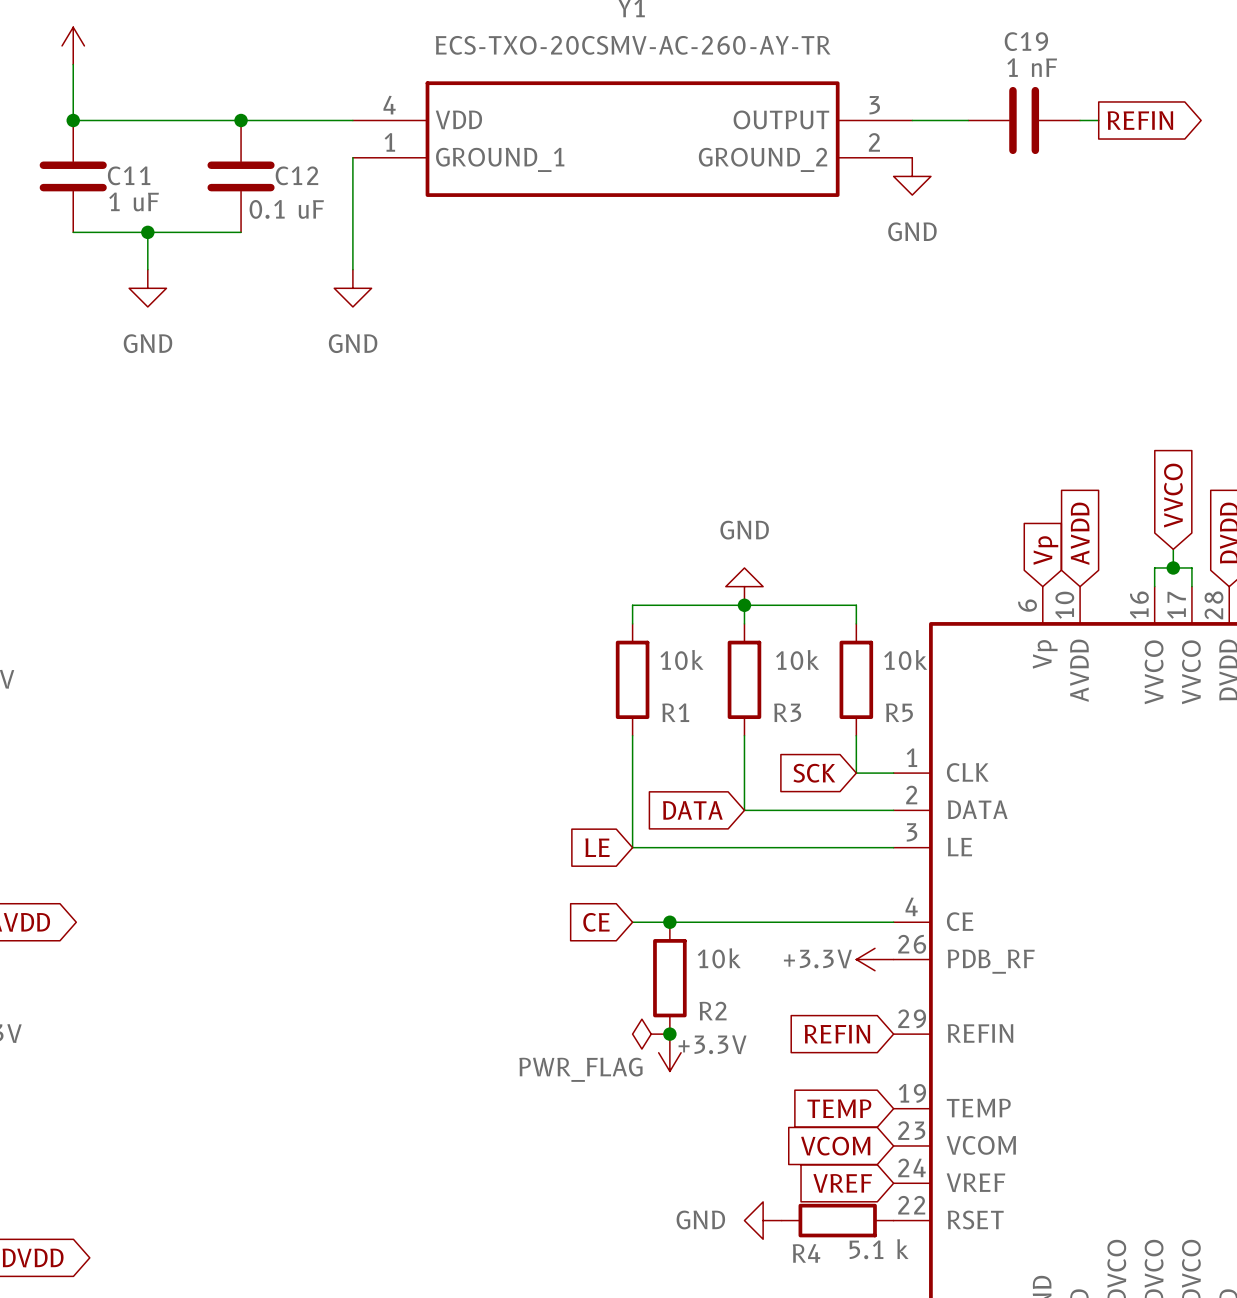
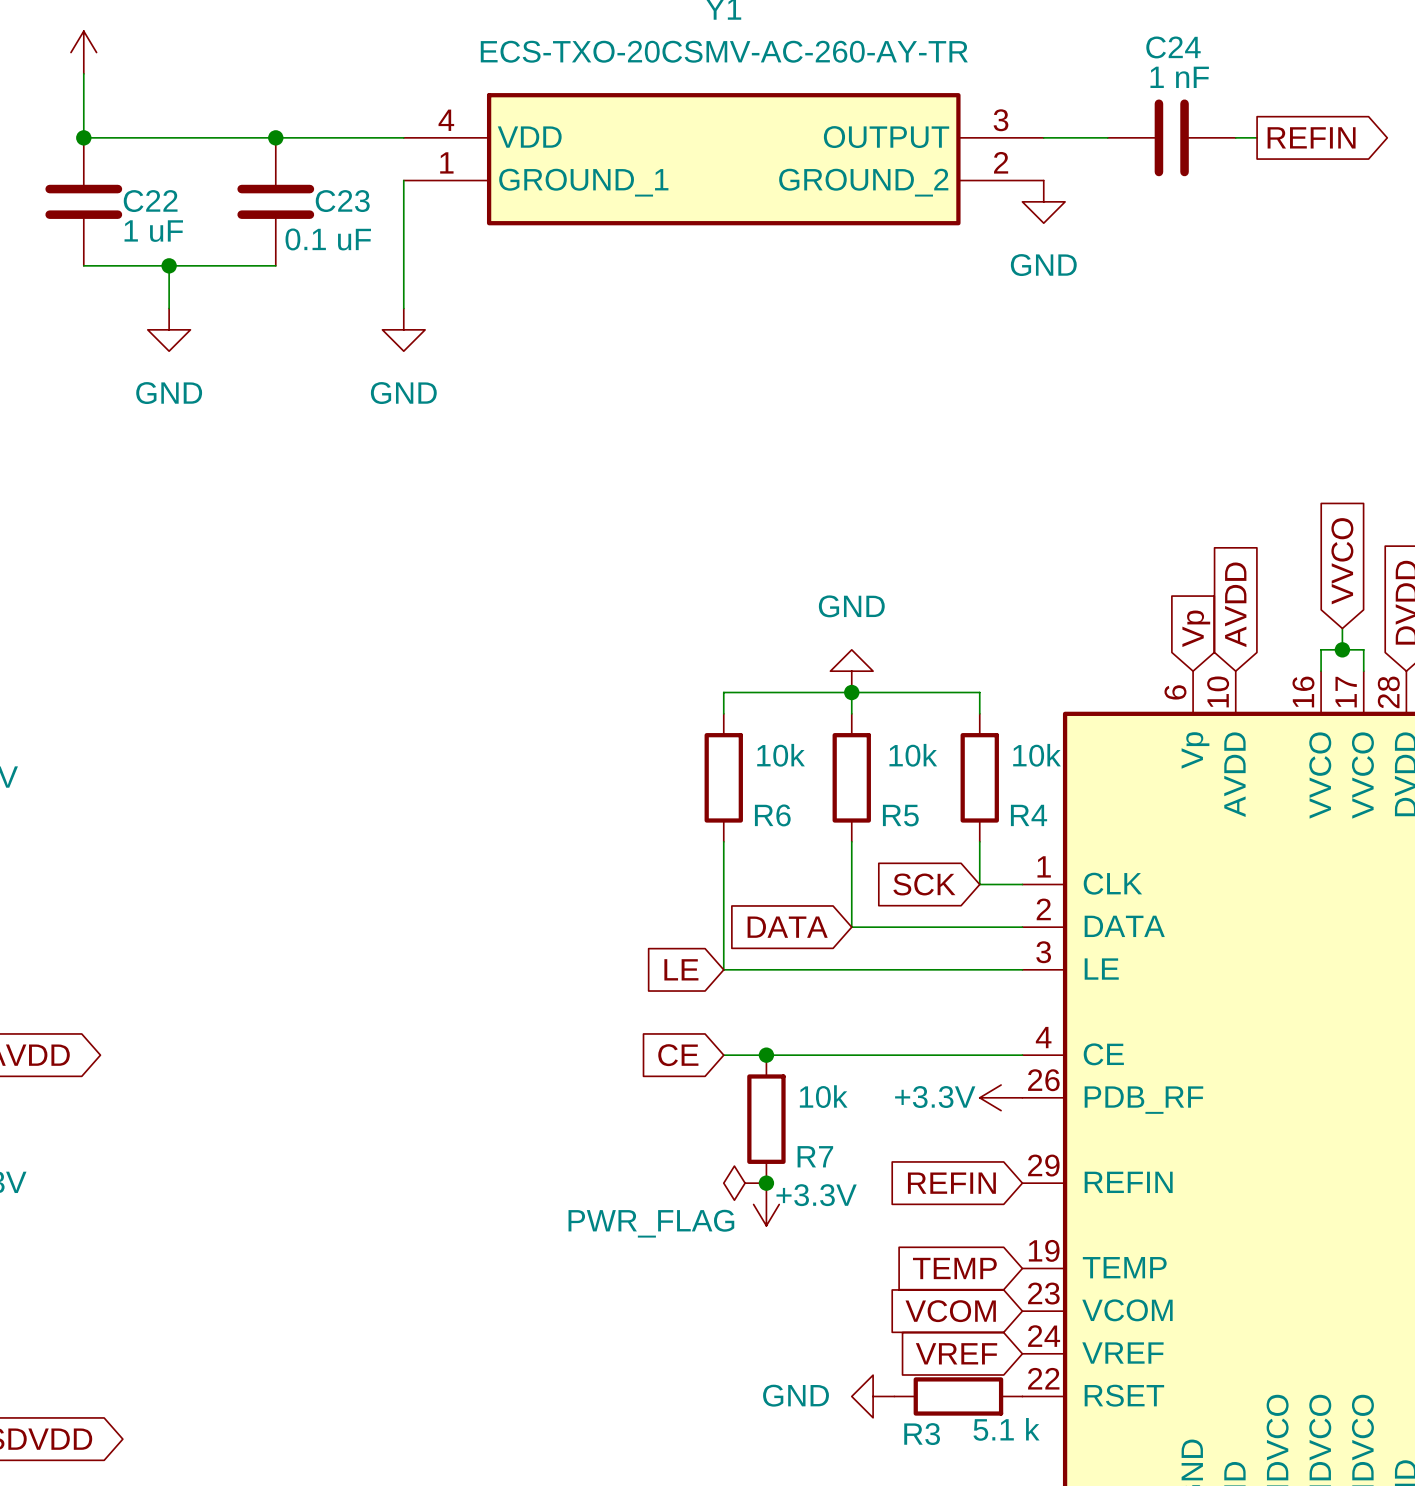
C19 name: C19 (1026, 41) -> C24 (1173, 47)
C11 name: C11 (129, 175) -> C22 (150, 201)
C12 name: C12 (296, 175) -> C23 (342, 201)
R1 name: R1 (675, 712) -> R6 (772, 815)
R3 name: R3 (787, 712) -> R5 (900, 815)
R5 name: R5 (899, 712) -> R4 (1029, 815)
R2 name: R2 (713, 1011) -> R7 (815, 1156)
R4 name: R4 (806, 1253) -> R3 (922, 1434)

